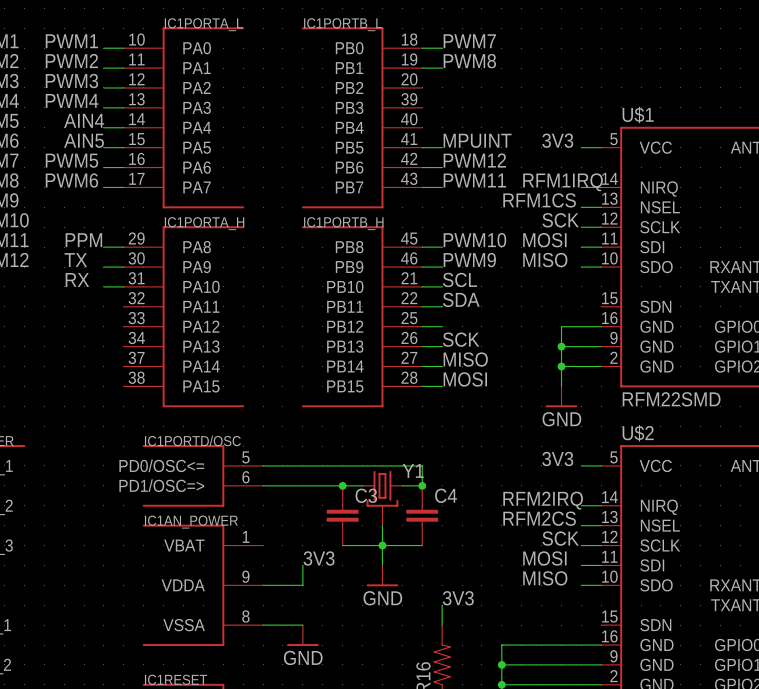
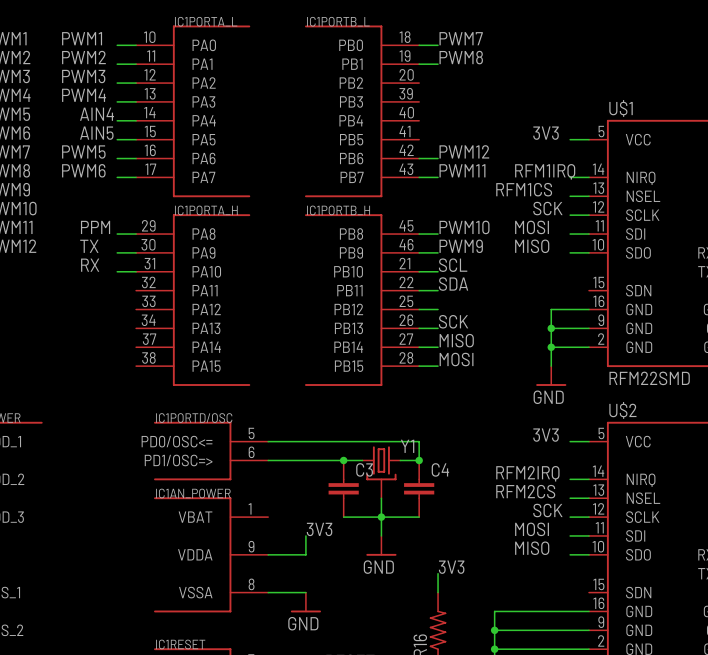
label: MPUINT (477, 140) -> none
wire: (422, 147) (442, 147) -> none

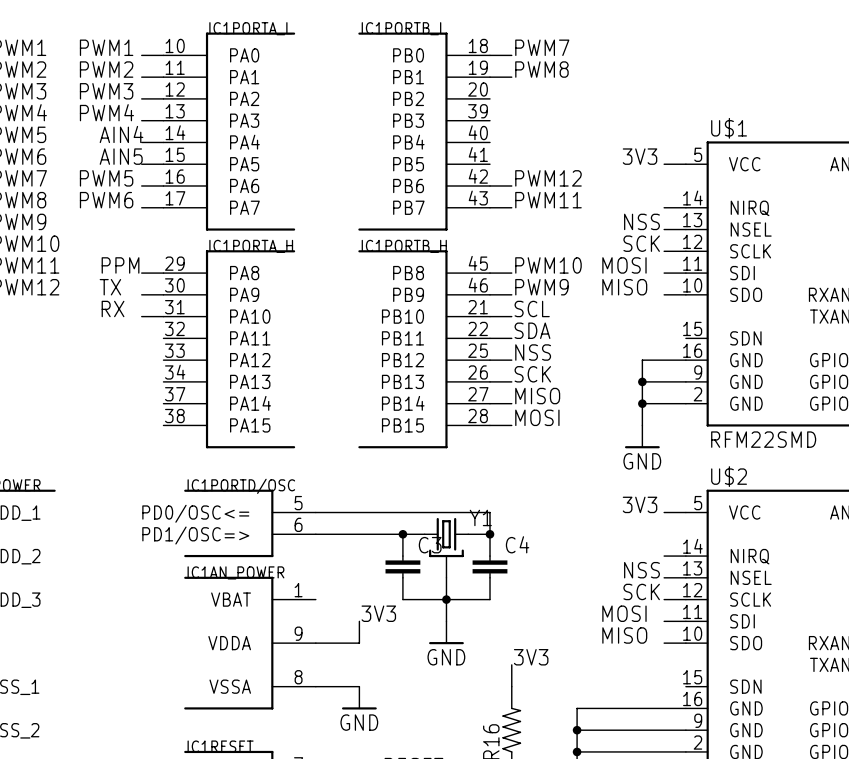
label: RFM1IRQ (545, 171) -> none
label: RFM1CS (524, 189) -> none
label: none -> NSS (641, 221)
label: none -> NSS (533, 352)
label: RFM2IRQ (527, 473) -> none
label: RFM2CS (525, 491) -> none
label: none -> NSS (641, 570)

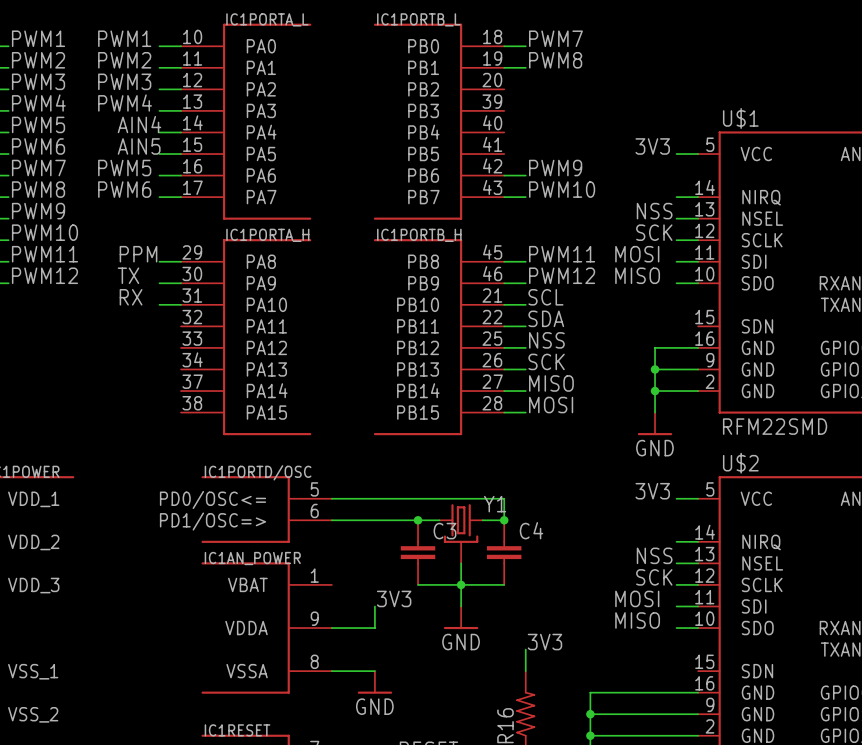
label: PWM12 (548, 178) -> PWM9 (555, 168)
label: PWM11 (548, 200) -> PWM10 (562, 189)
label: PWM10 (548, 265) -> PWM11 (562, 254)
label: PWM9 (541, 287) -> PWM12 (562, 275)

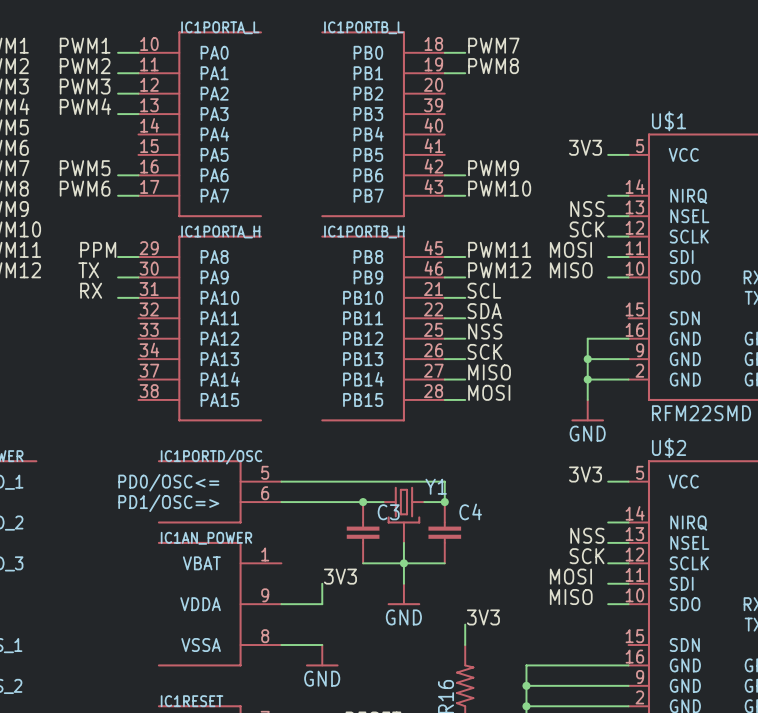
label: AIN4 (139, 124) -> none
wire: (159, 132) (181, 132) -> none
label: AIN5 (139, 146) -> none
wire: (159, 154) (181, 154) -> none

